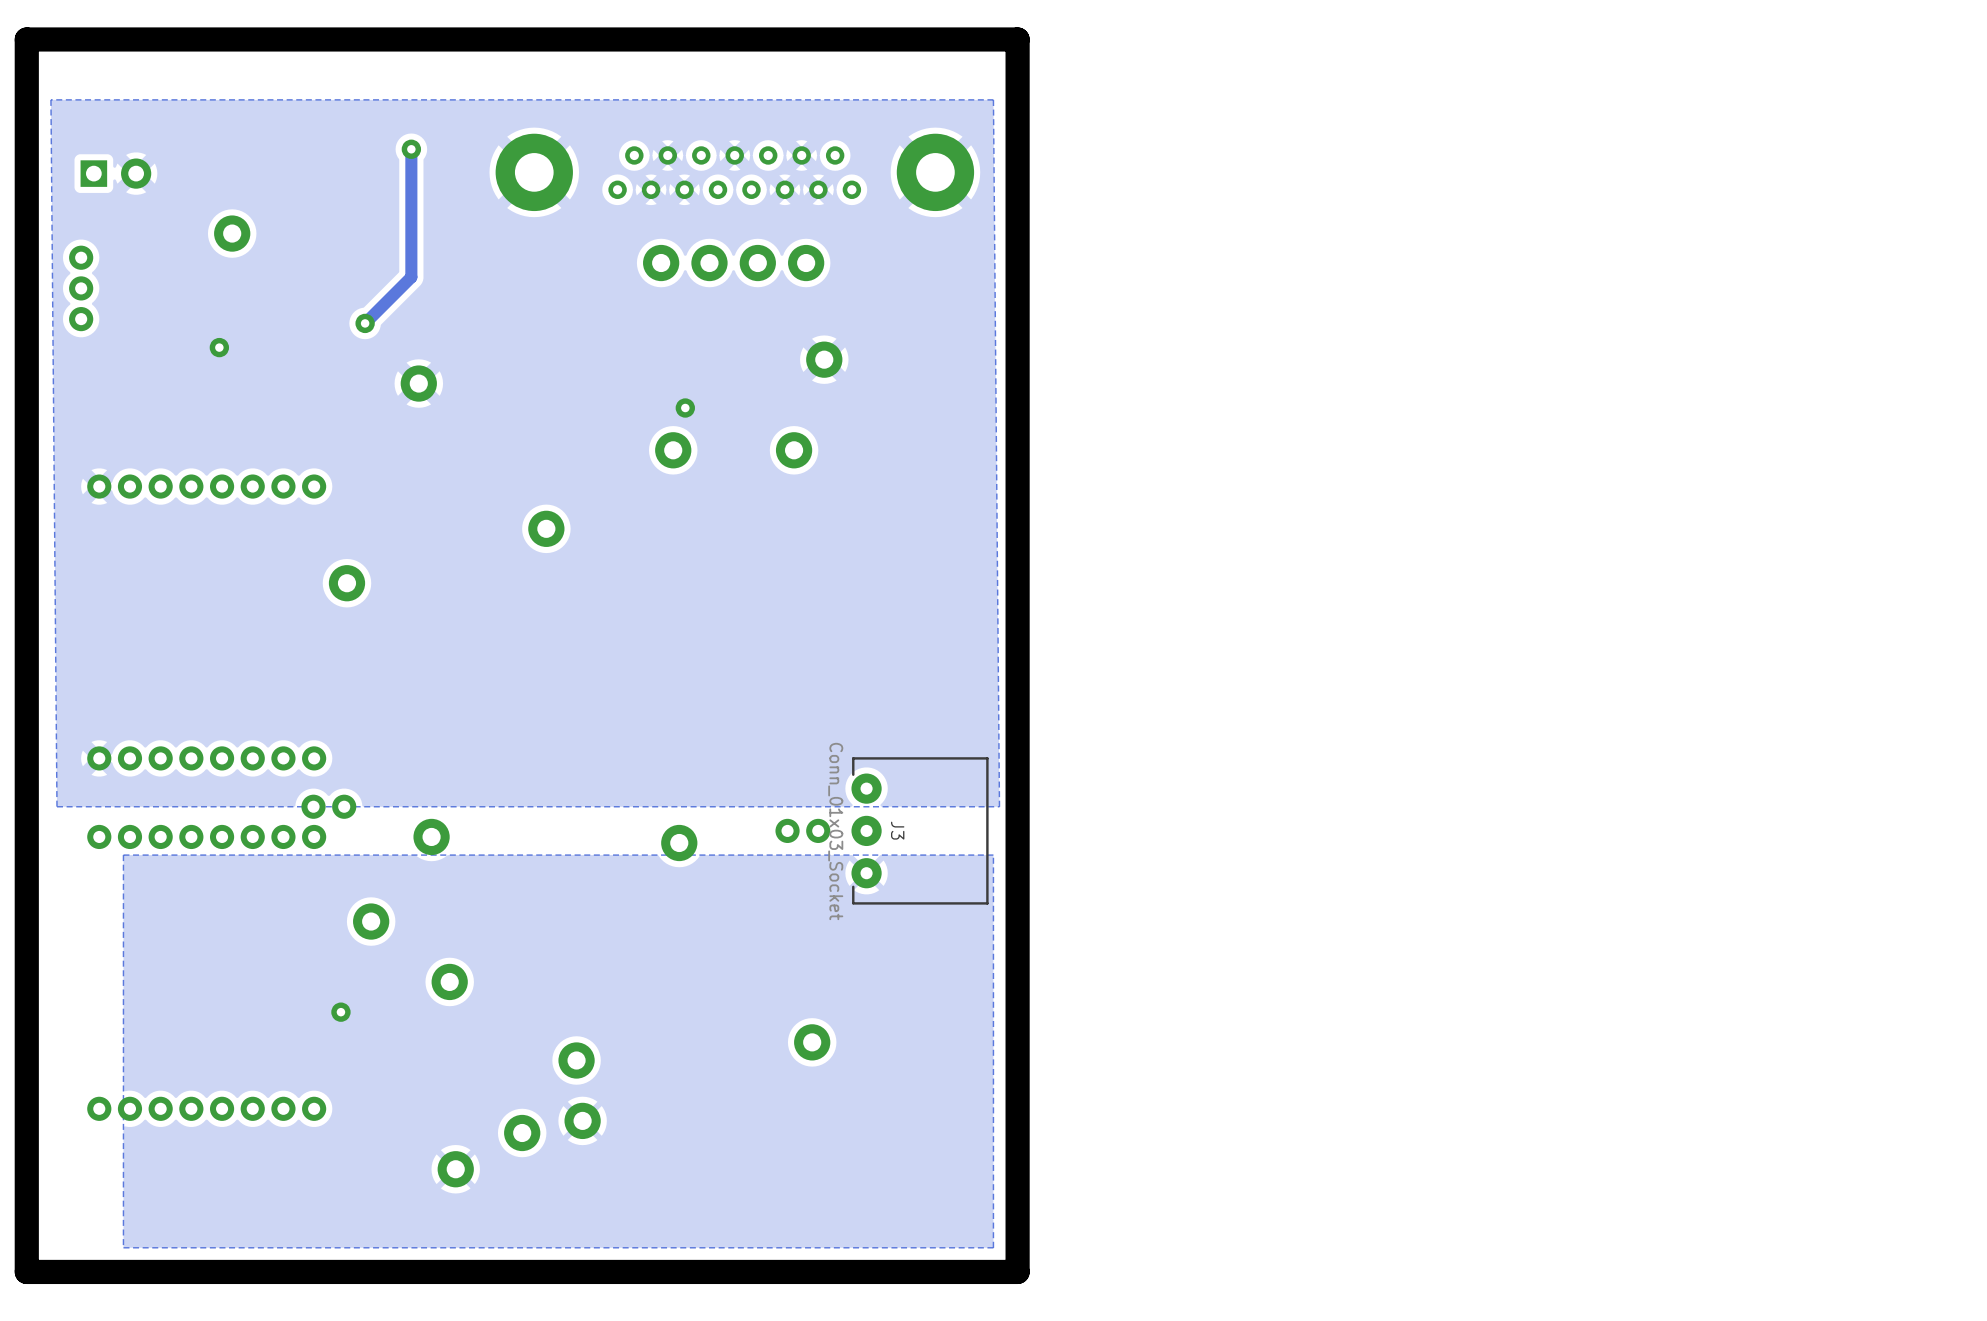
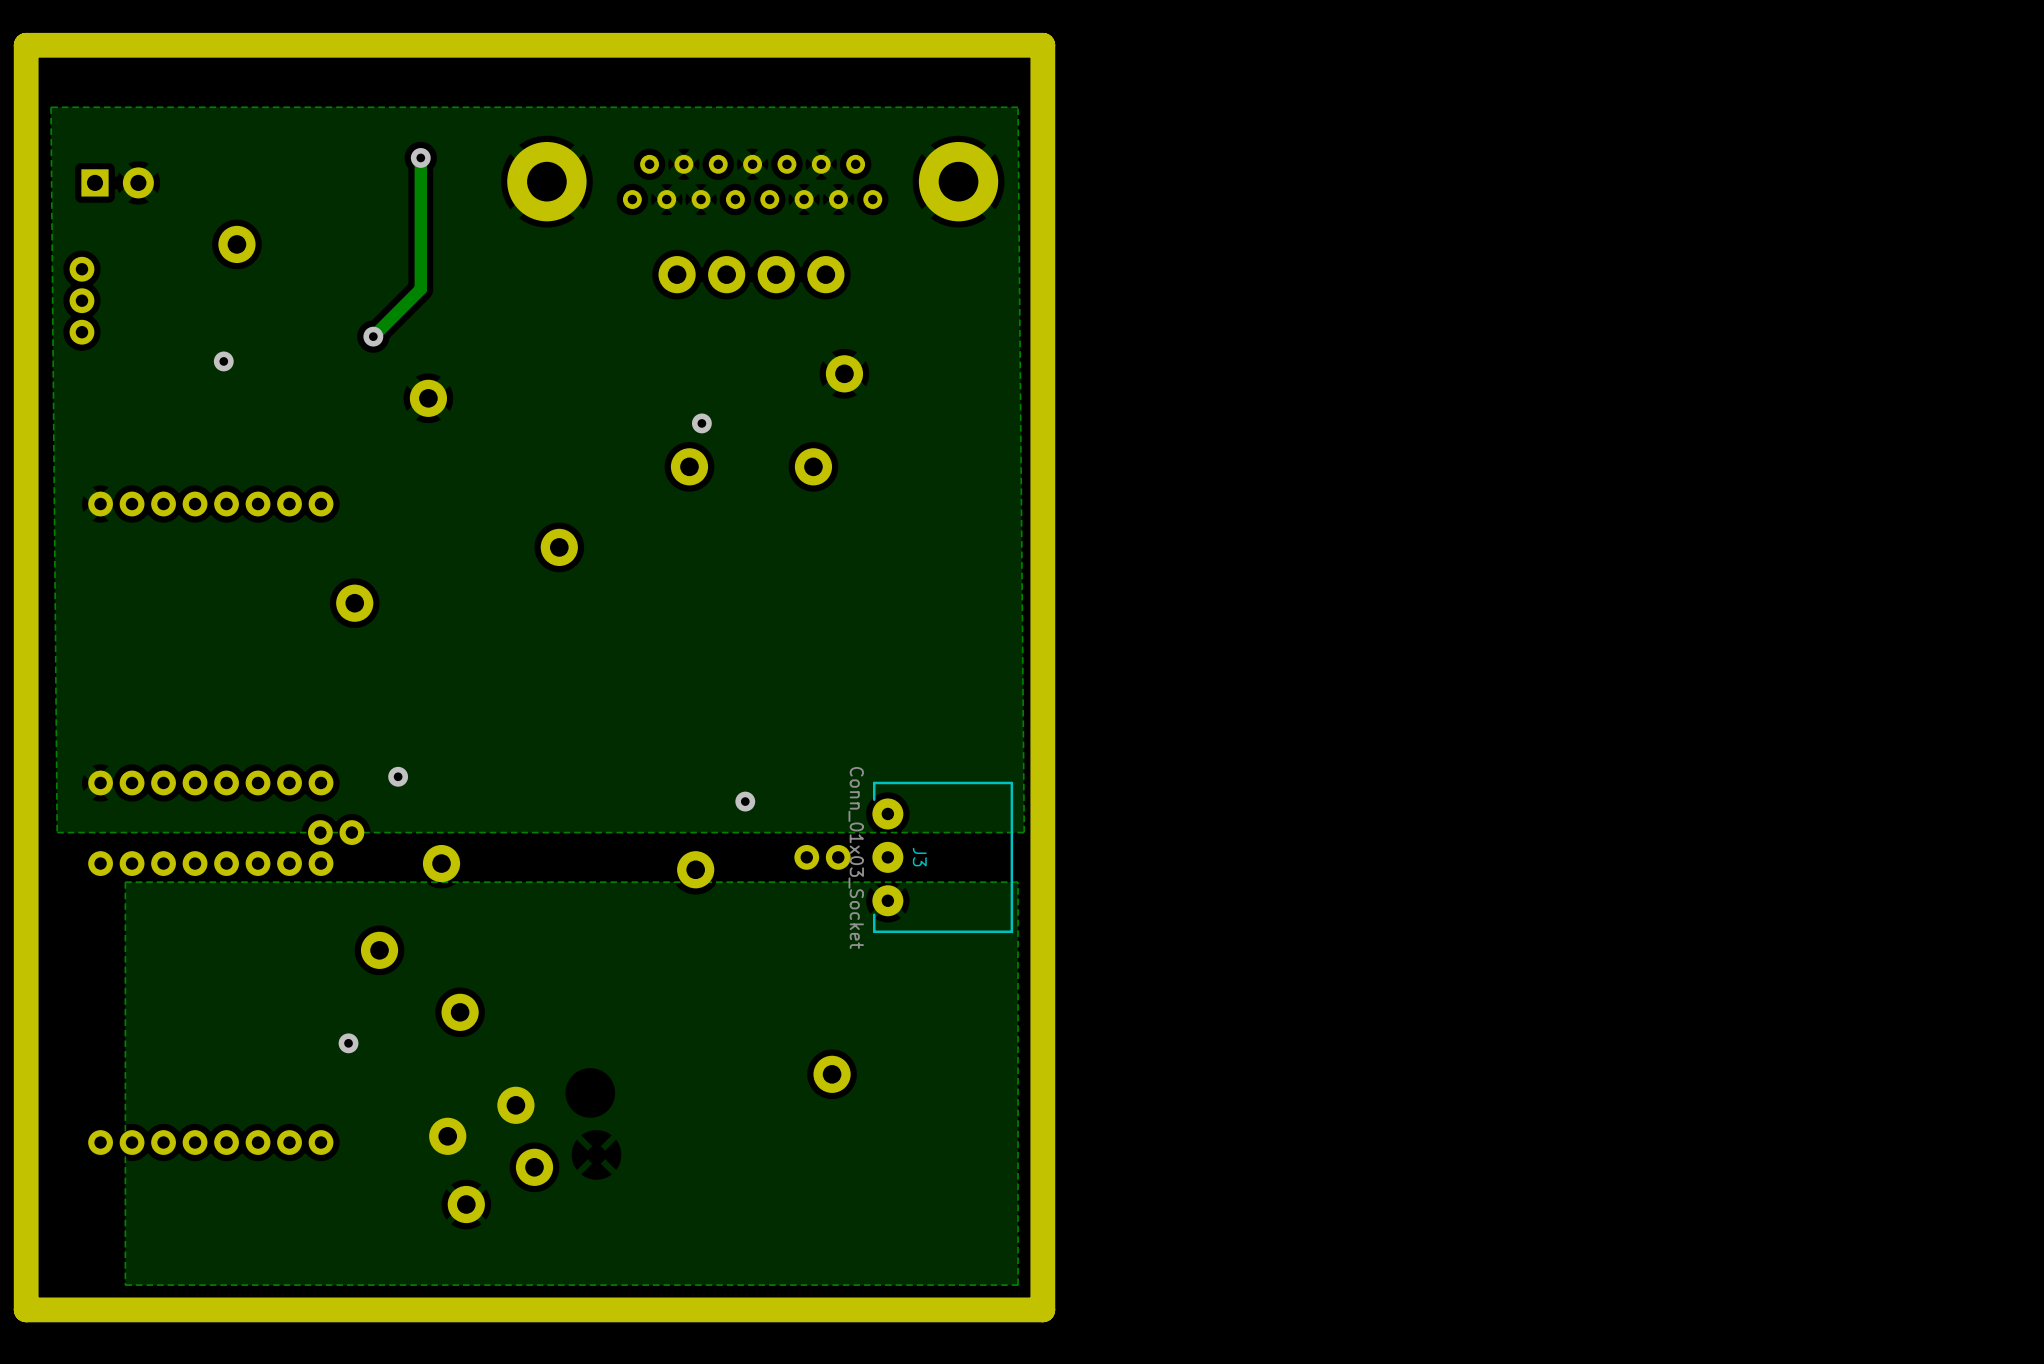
via: none -> (398, 776)
via: none -> (745, 801)
part: (576, 1060) -> none
part: none -> (515, 1105)
part: none -> (447, 1136)
part: (582, 1120) -> none

